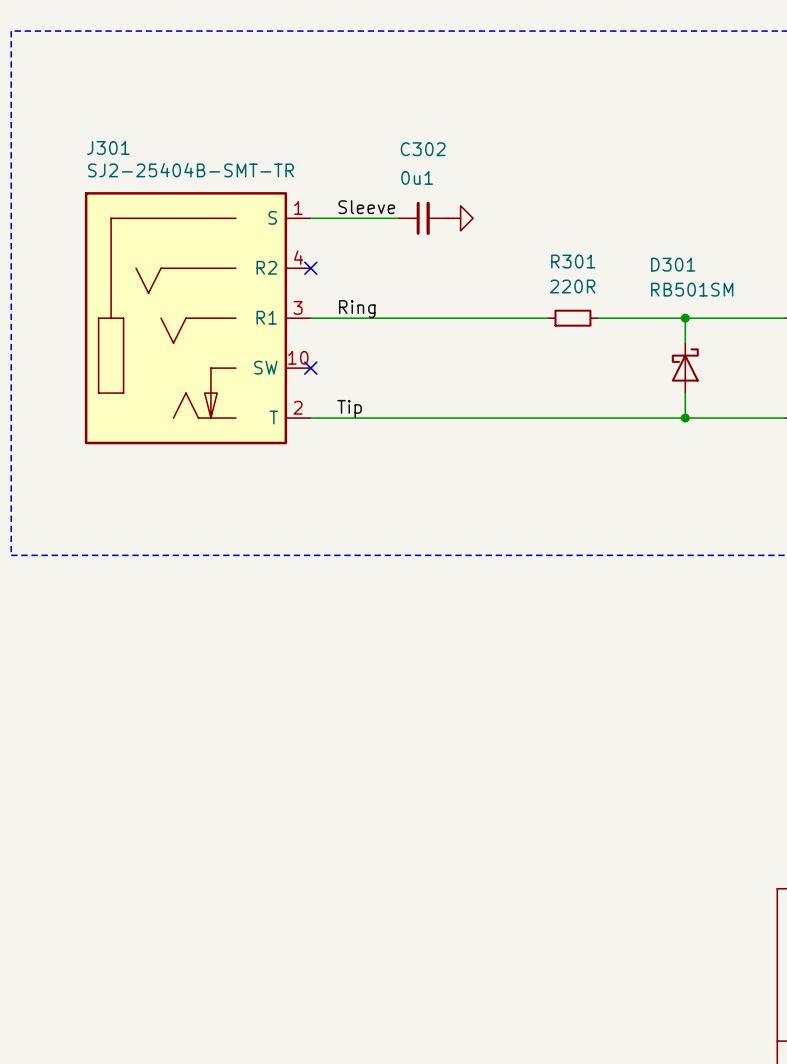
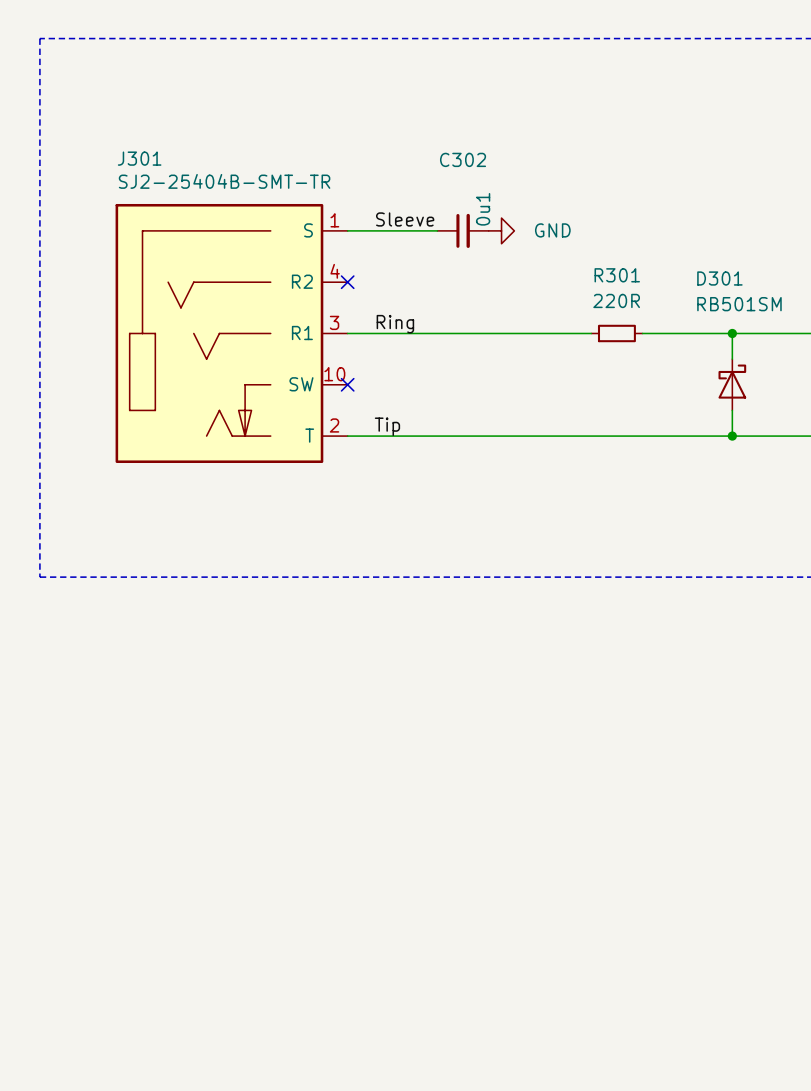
C302 value rotation: 0° (417, 177) -> 90° counterclockwise (483, 209)
power symbol text: none -> GND (552, 230)

